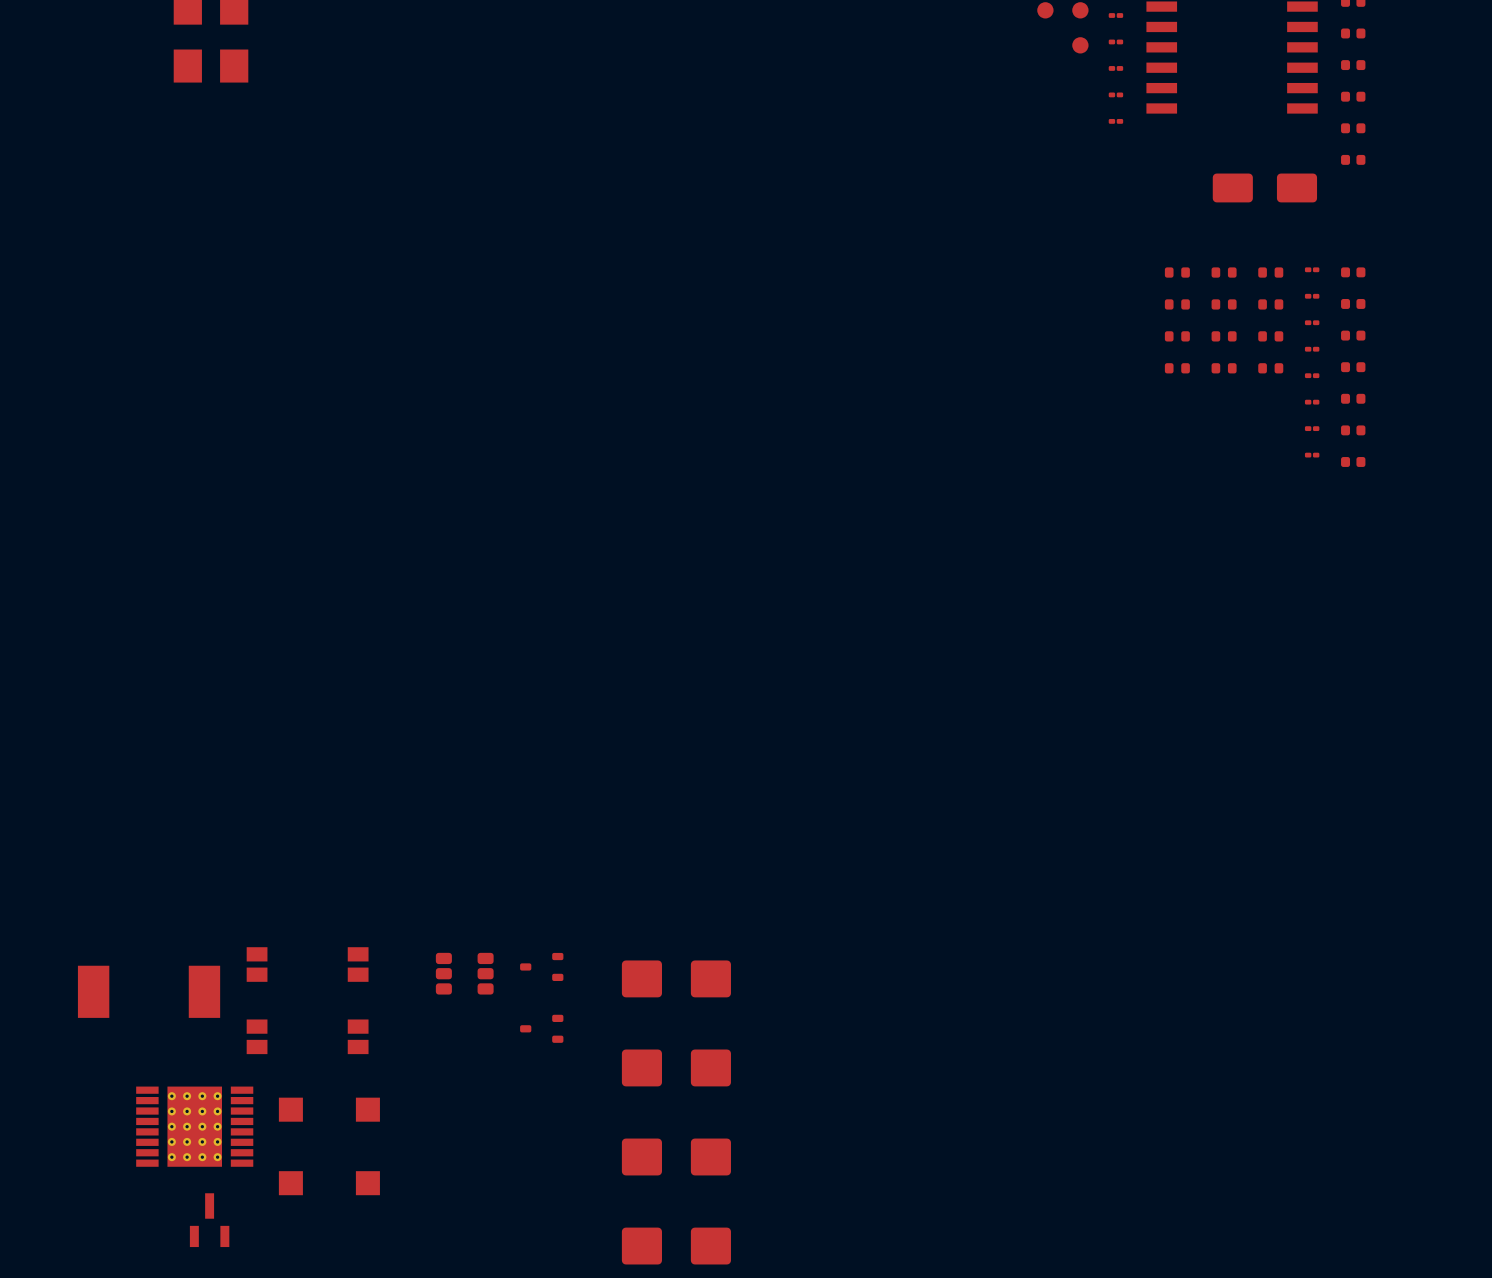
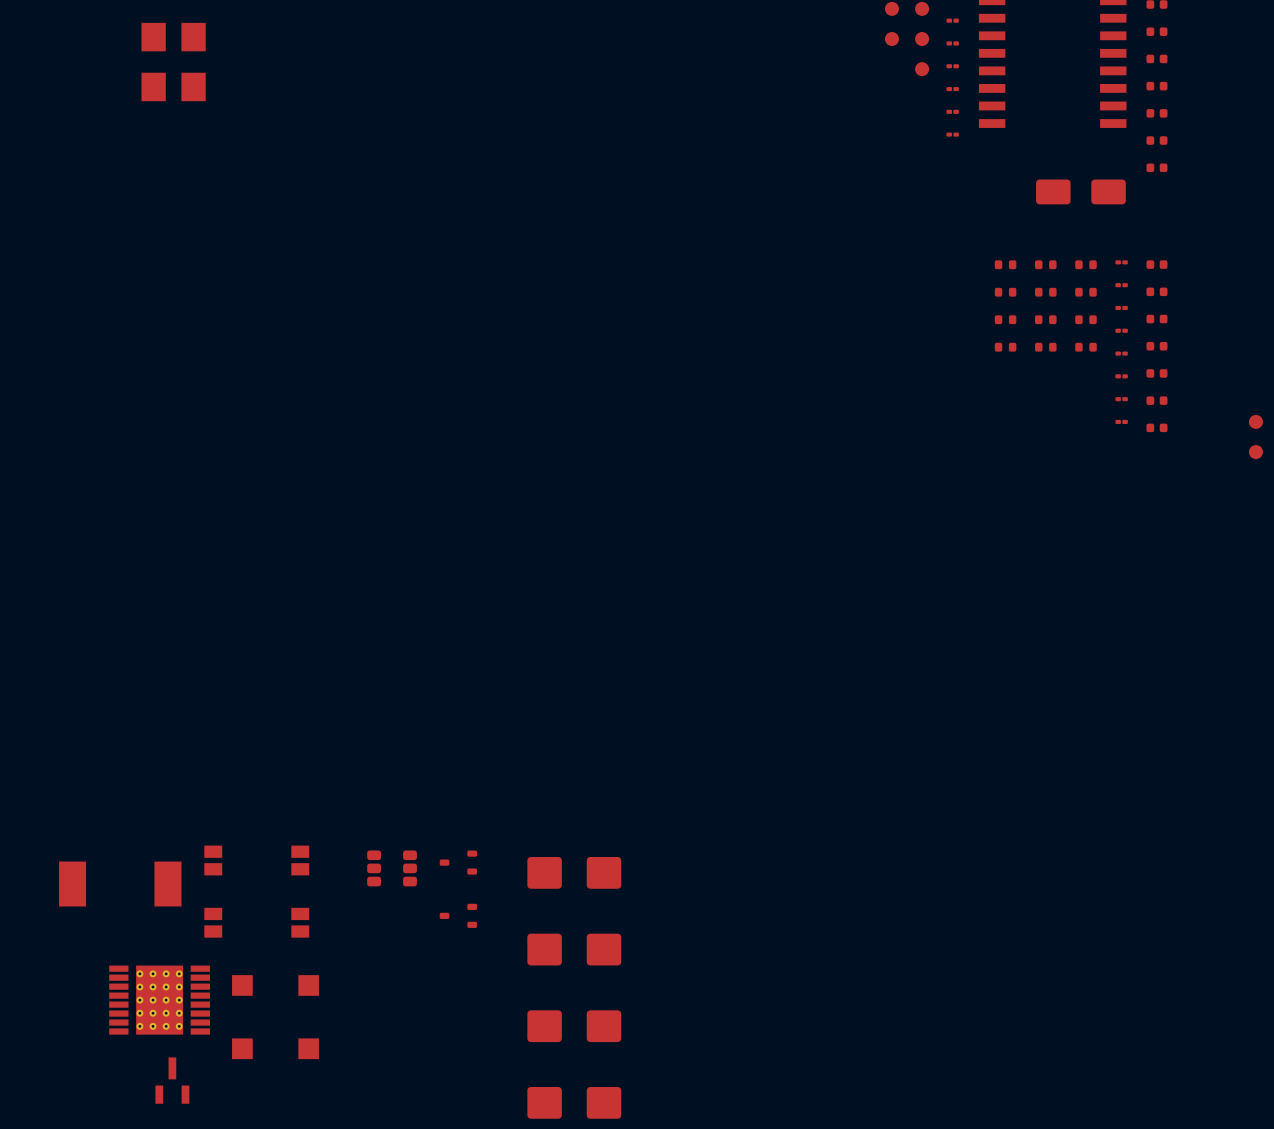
part: none -> (1255, 421)
part: none -> (1255, 452)

